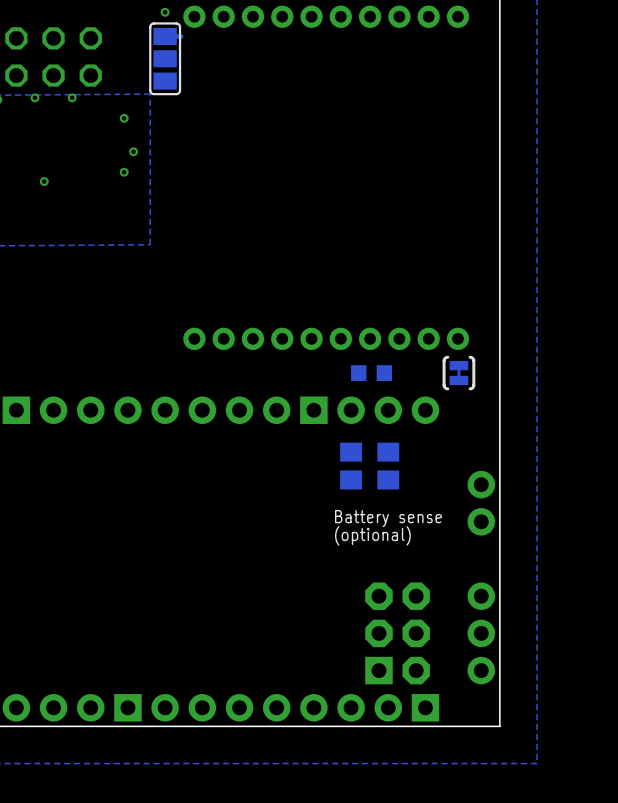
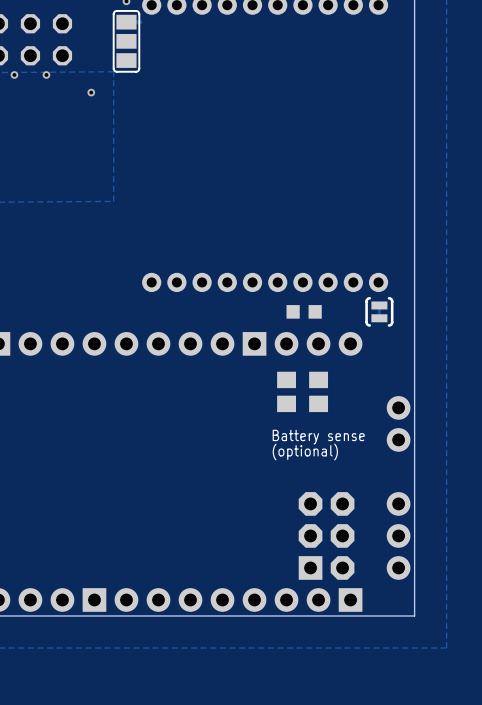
via: (133, 151) -> none
via: (124, 172) -> none
via: (44, 181) -> none

